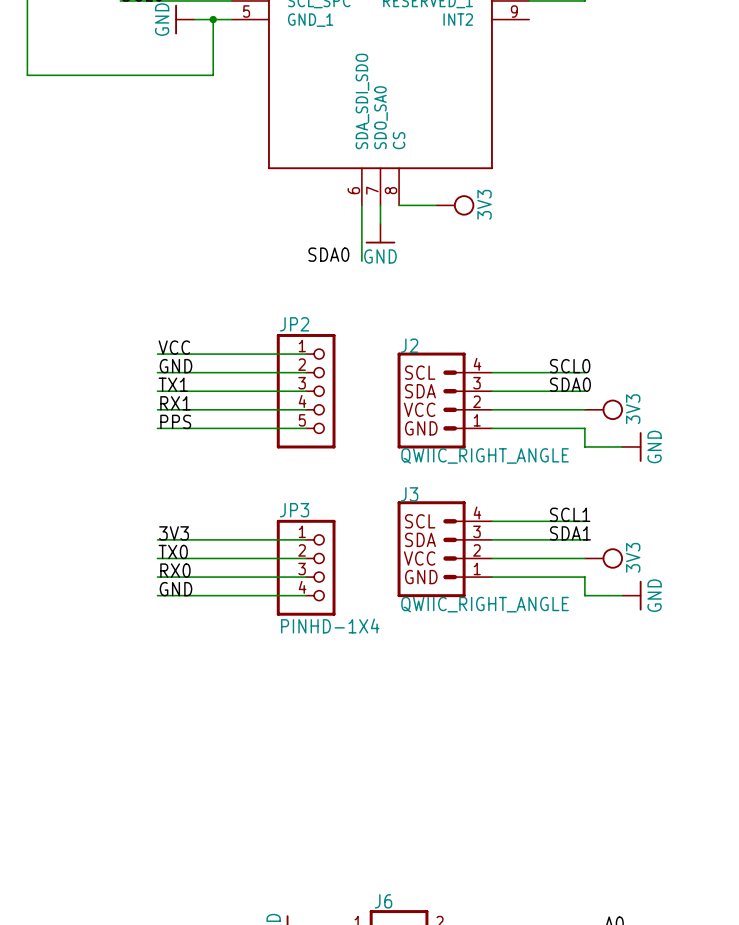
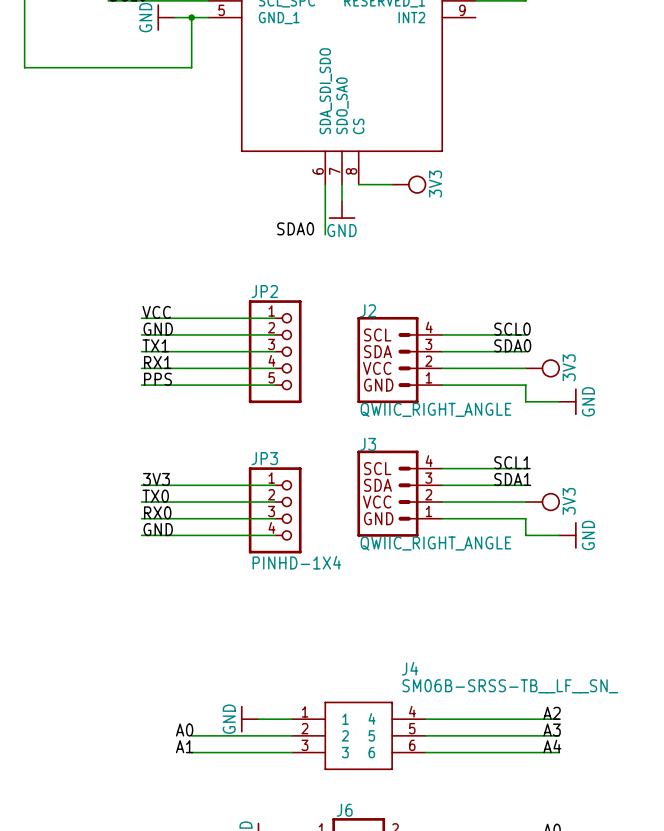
label: none -> A2 (552, 713)
power symbol: none -> GND (249, 719)
wire: none -> (258, 719) (291, 719)
wire: none -> (425, 719) (559, 719)
label: none -> A0 (184, 730)
label: none -> A3 (552, 730)
wire: none -> (191, 735) (291, 735)
J4: none -> SM06B-SRSS-TB__LF__SN_ (358, 735)
wire: none -> (425, 735) (559, 735)
label: none -> A1 (184, 746)
label: none -> A4 (552, 746)
wire: none -> (191, 752) (291, 752)
wire: none -> (425, 752) (559, 752)

